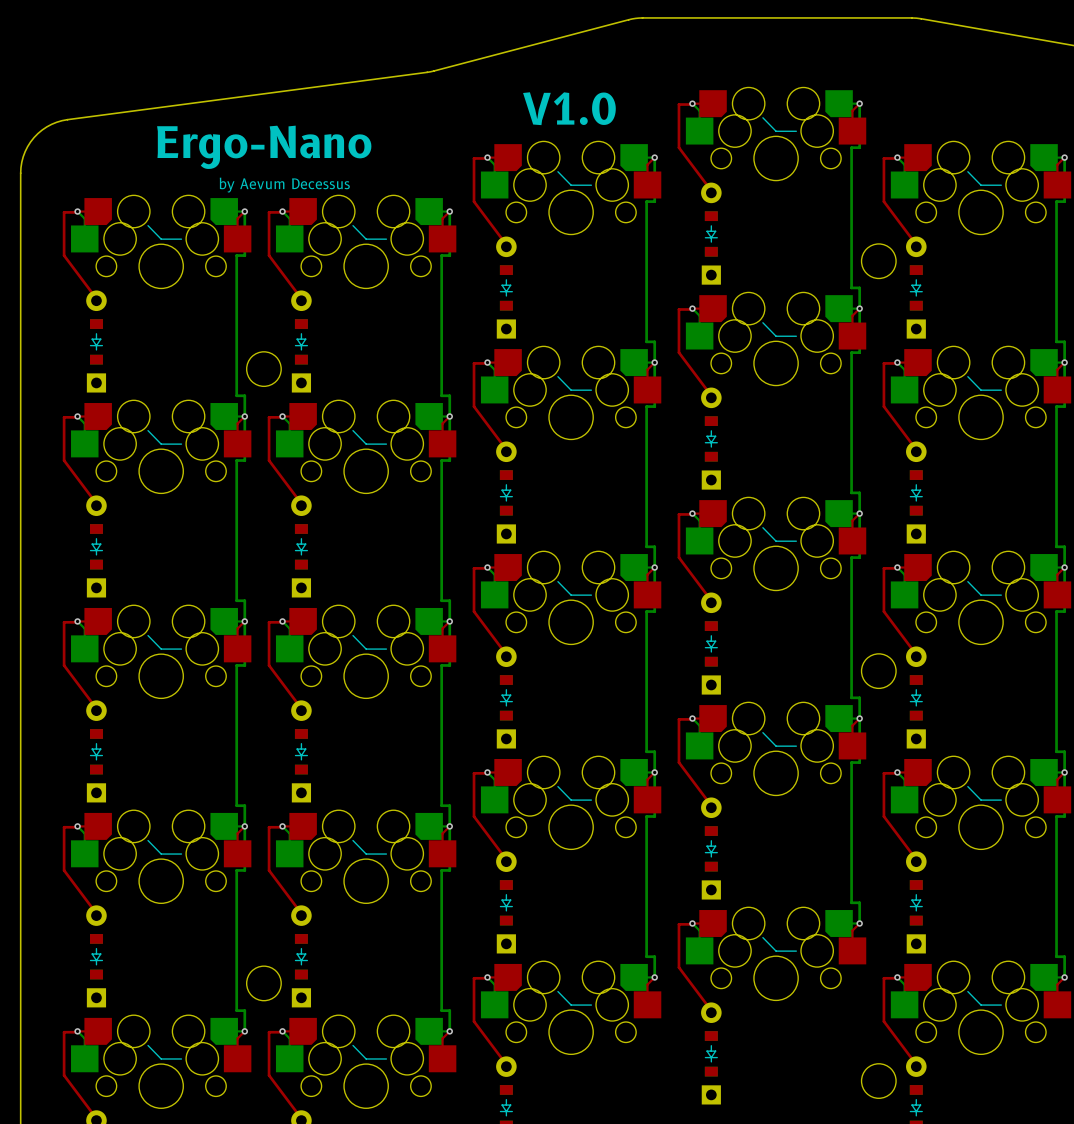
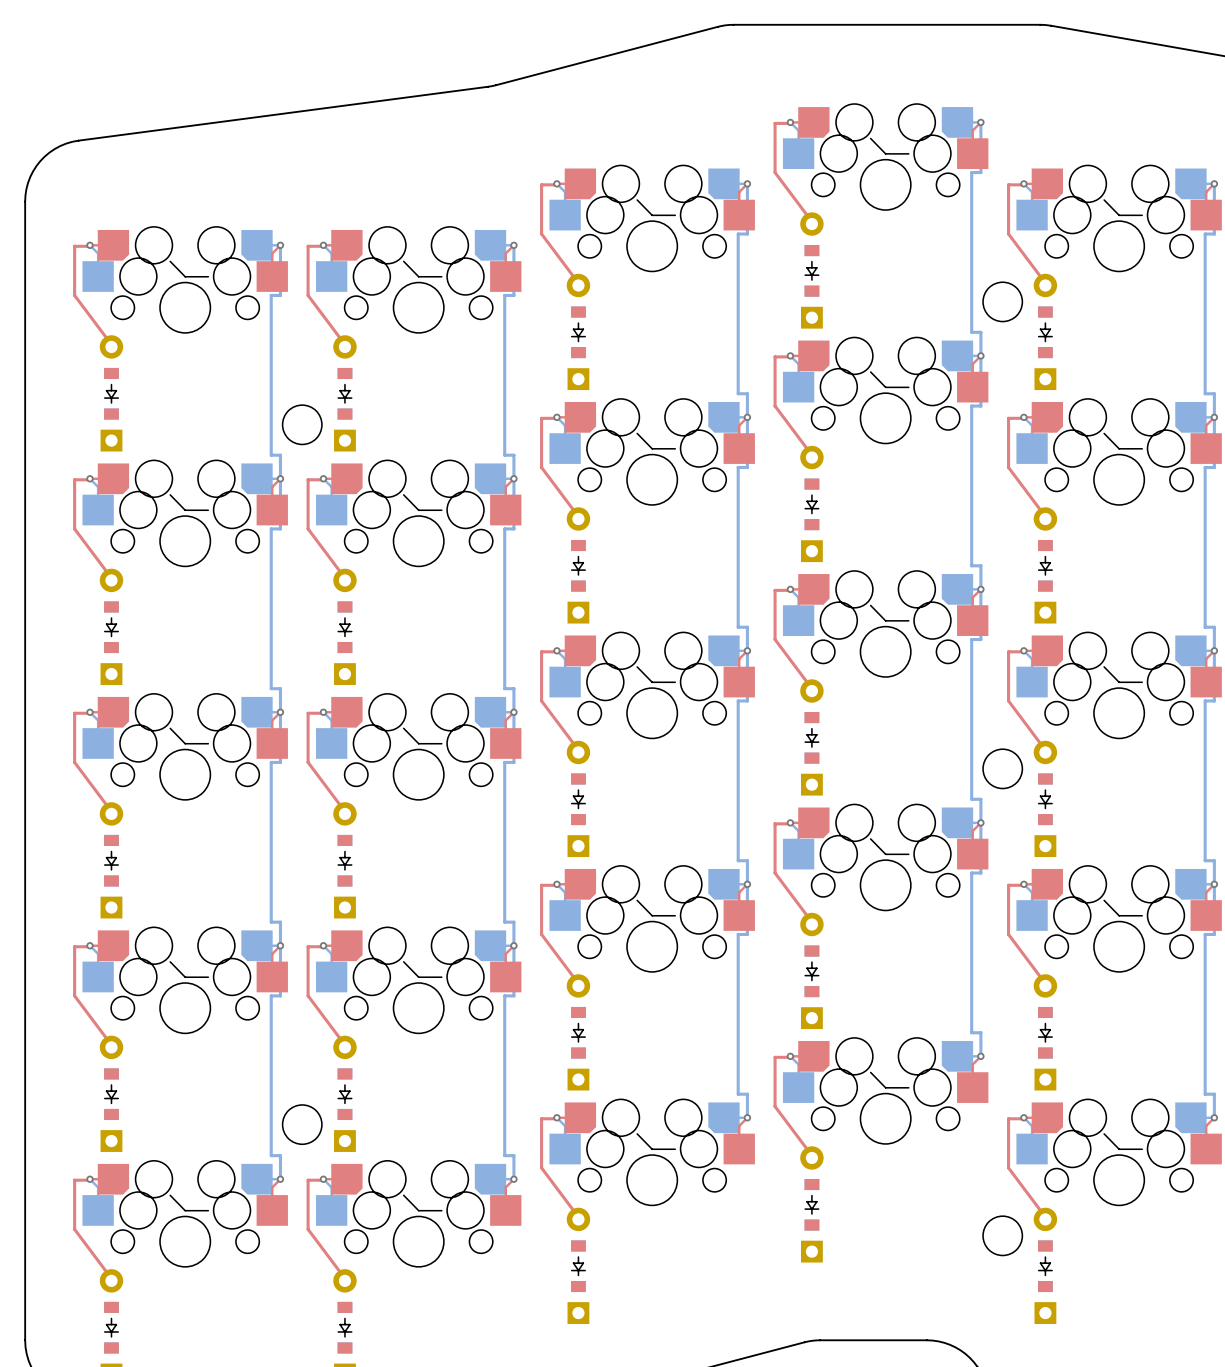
text: V1.0 (569, 108) -> none
text: Ergo-Nano (264, 147) -> none
text: by Aevum Decessus (284, 185) -> none

